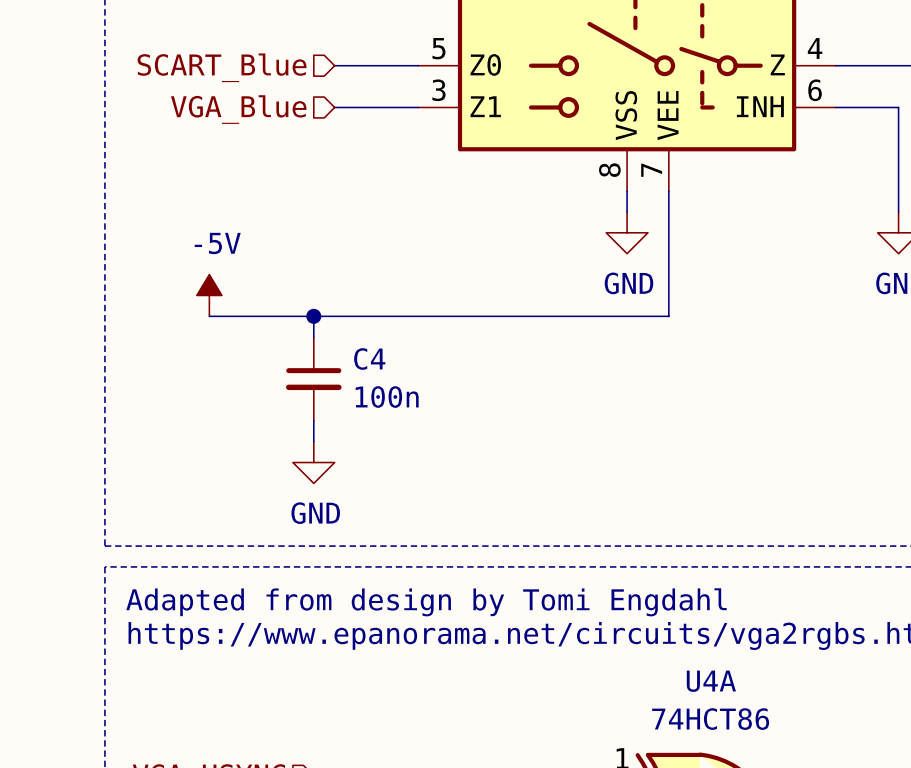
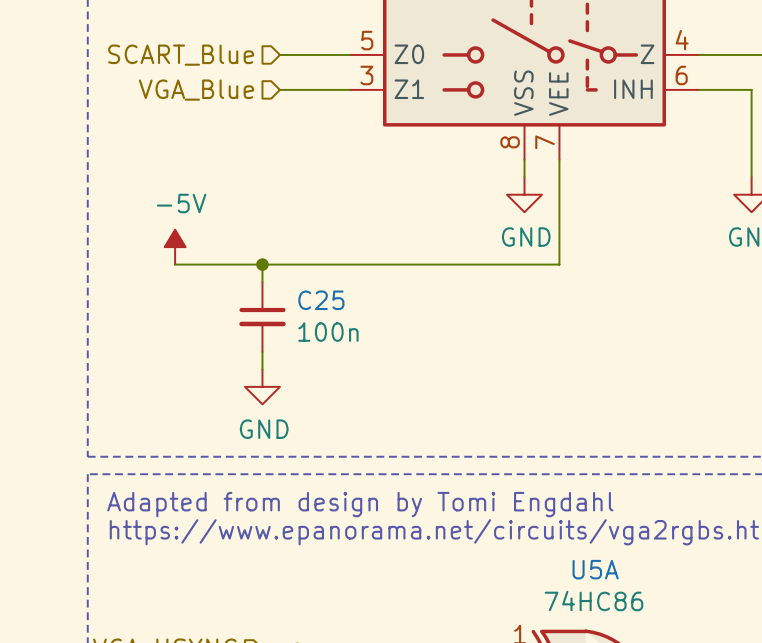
C4 name: C4 (369, 359) -> C25 (321, 300)
U4A name: U4A (711, 681) -> U5A (595, 569)
U4A value: 74HCT86 (710, 719) -> 74HC86 (593, 601)

